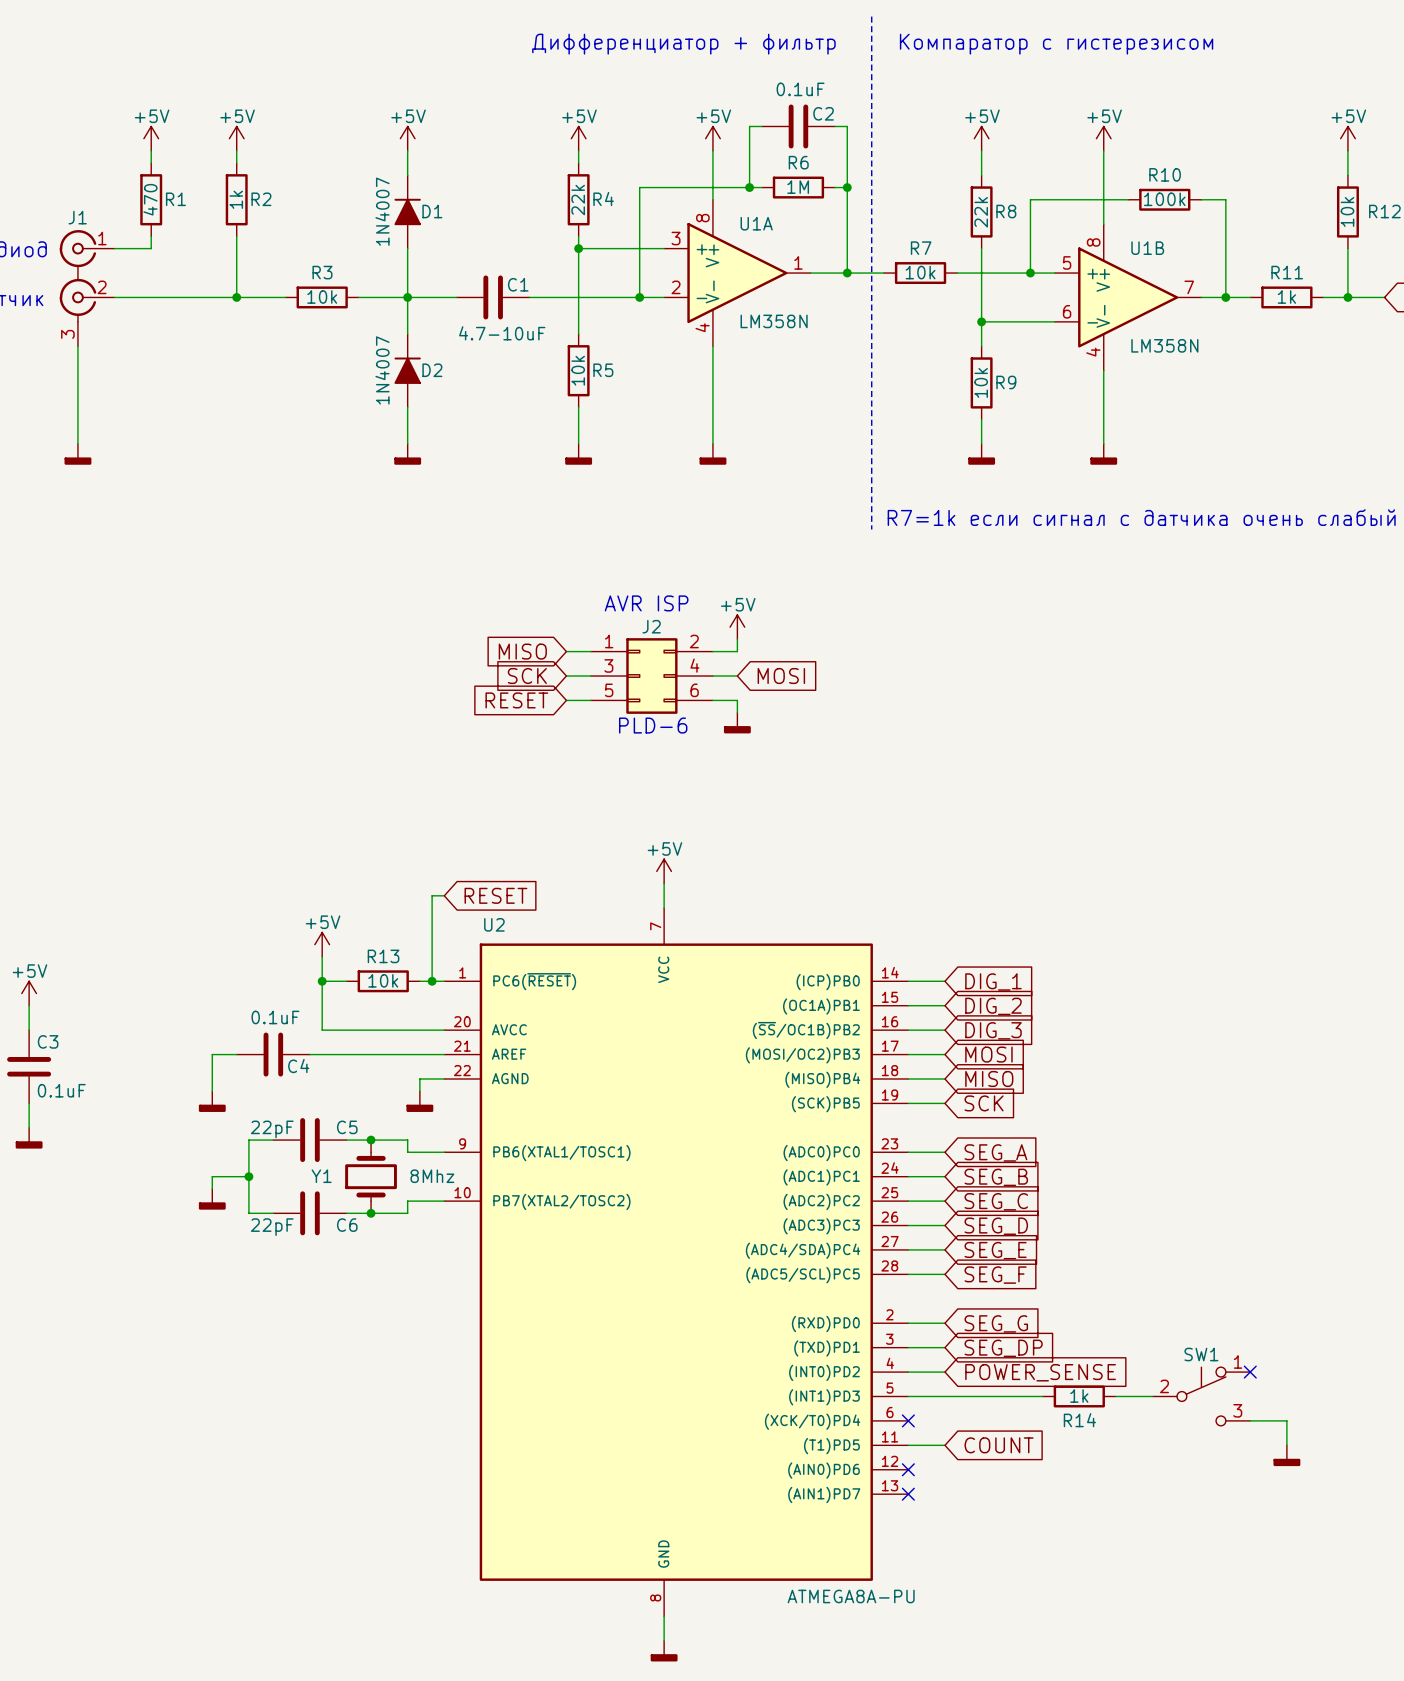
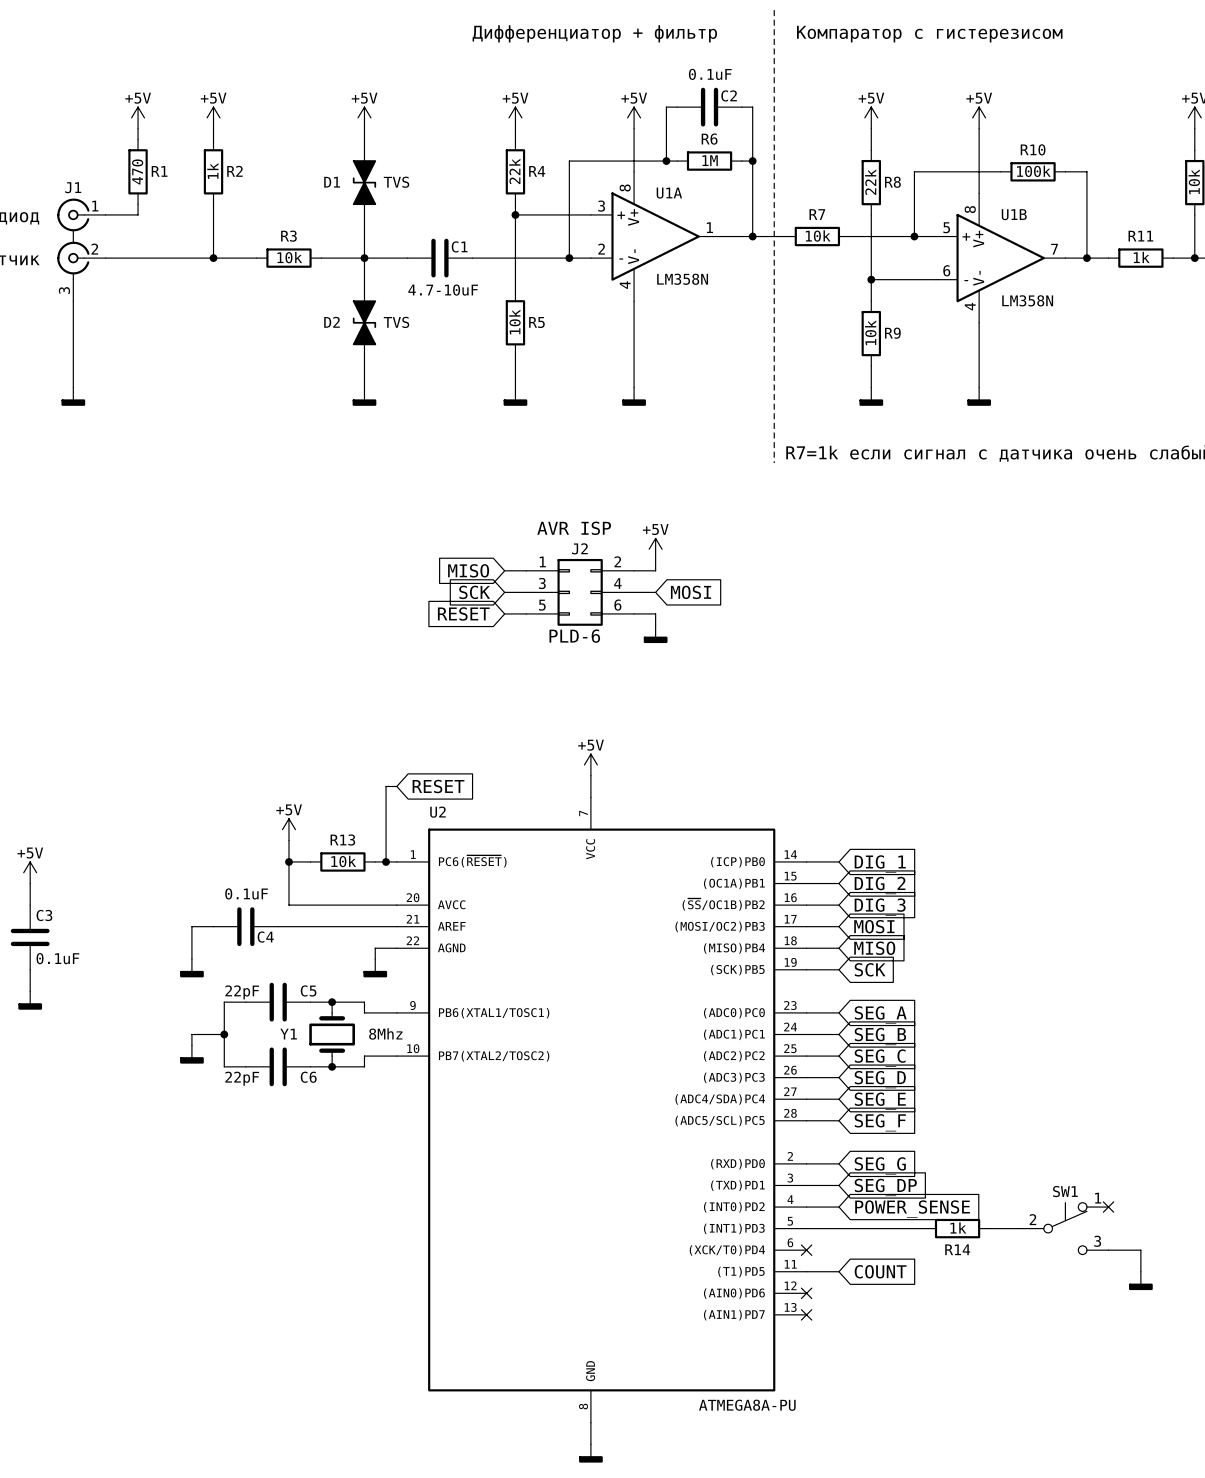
D1 symbol: [394, 175, 421, 249] -> [352, 150, 377, 215]
D1 value: 1N4007 (382, 211) -> TVS (396, 182)
D1 name position: D1 (432, 211) -> D1 (332, 182)
D2 symbol: [394, 334, 421, 408] -> [352, 290, 377, 356]
D2 value: 1N4007 (382, 370) -> TVS (396, 322)
D2 name position: D2 (432, 370) -> D2 (331, 322)

